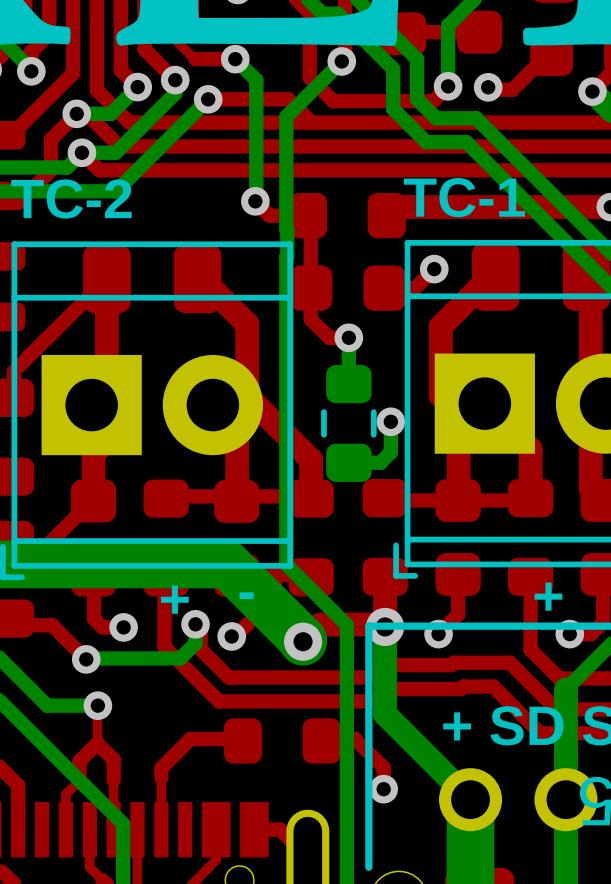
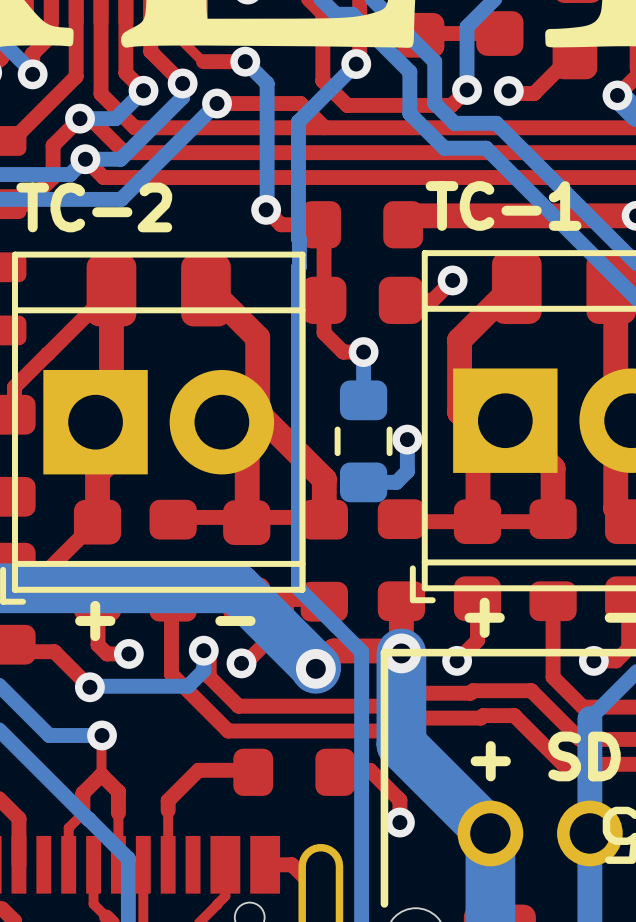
bottom track width: thin (385, 626) (385, 714) (470, 799) -> thick (401, 653) (401, 744) (490, 833)

